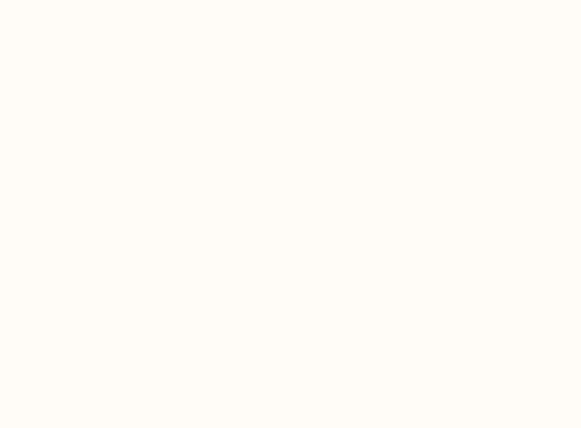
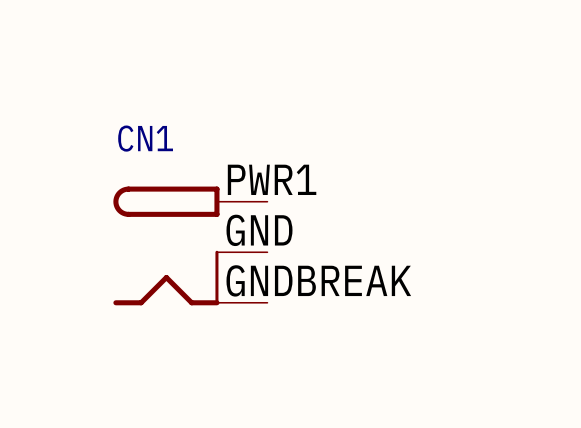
CN1: none -> (190, 245)

